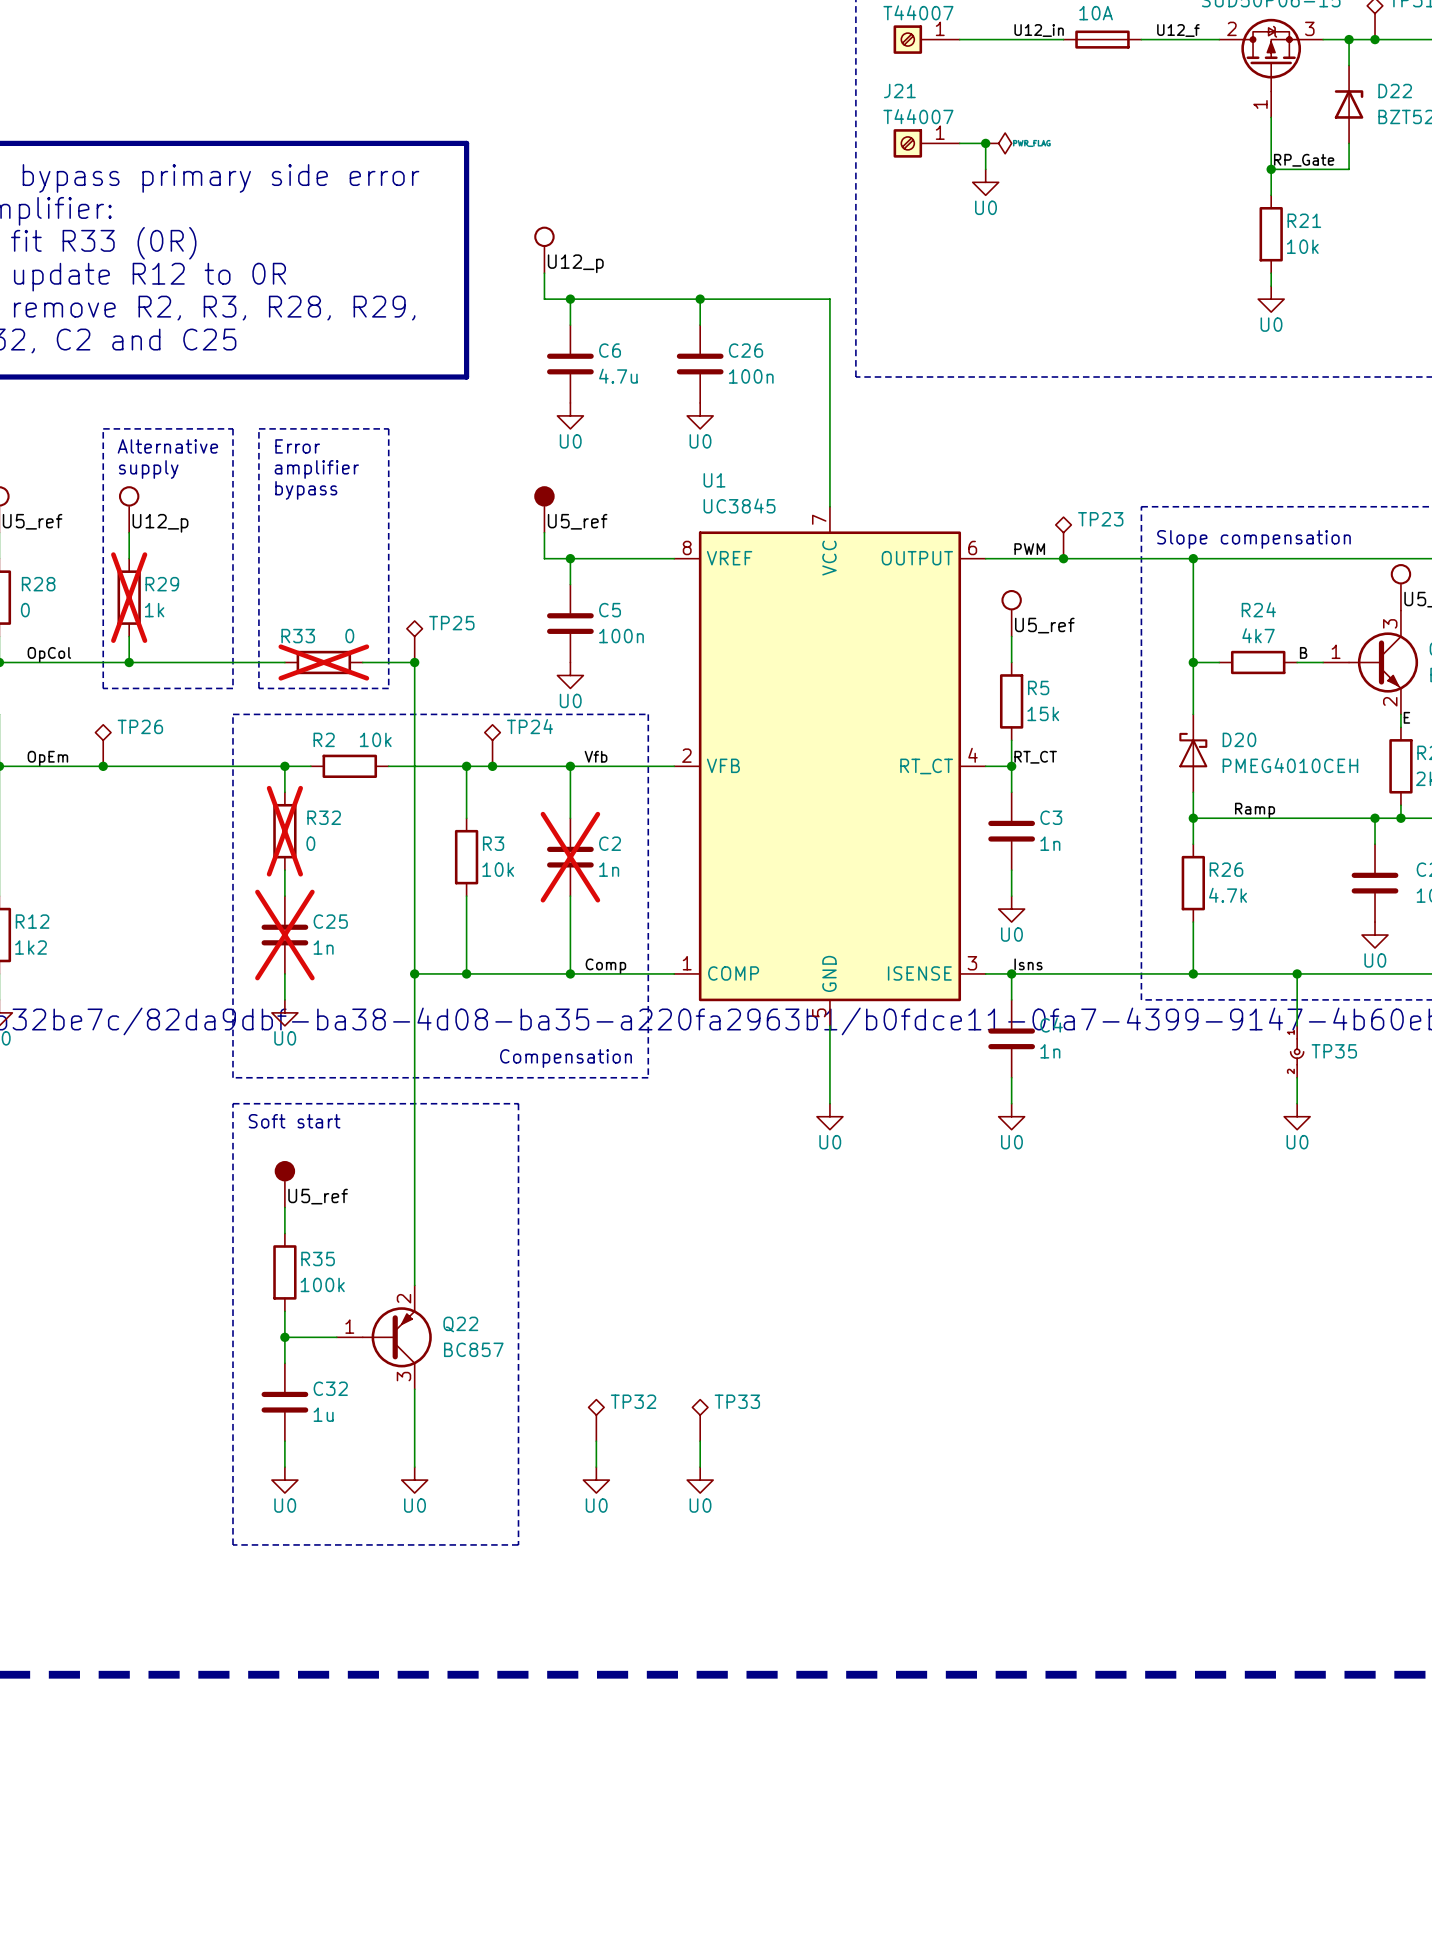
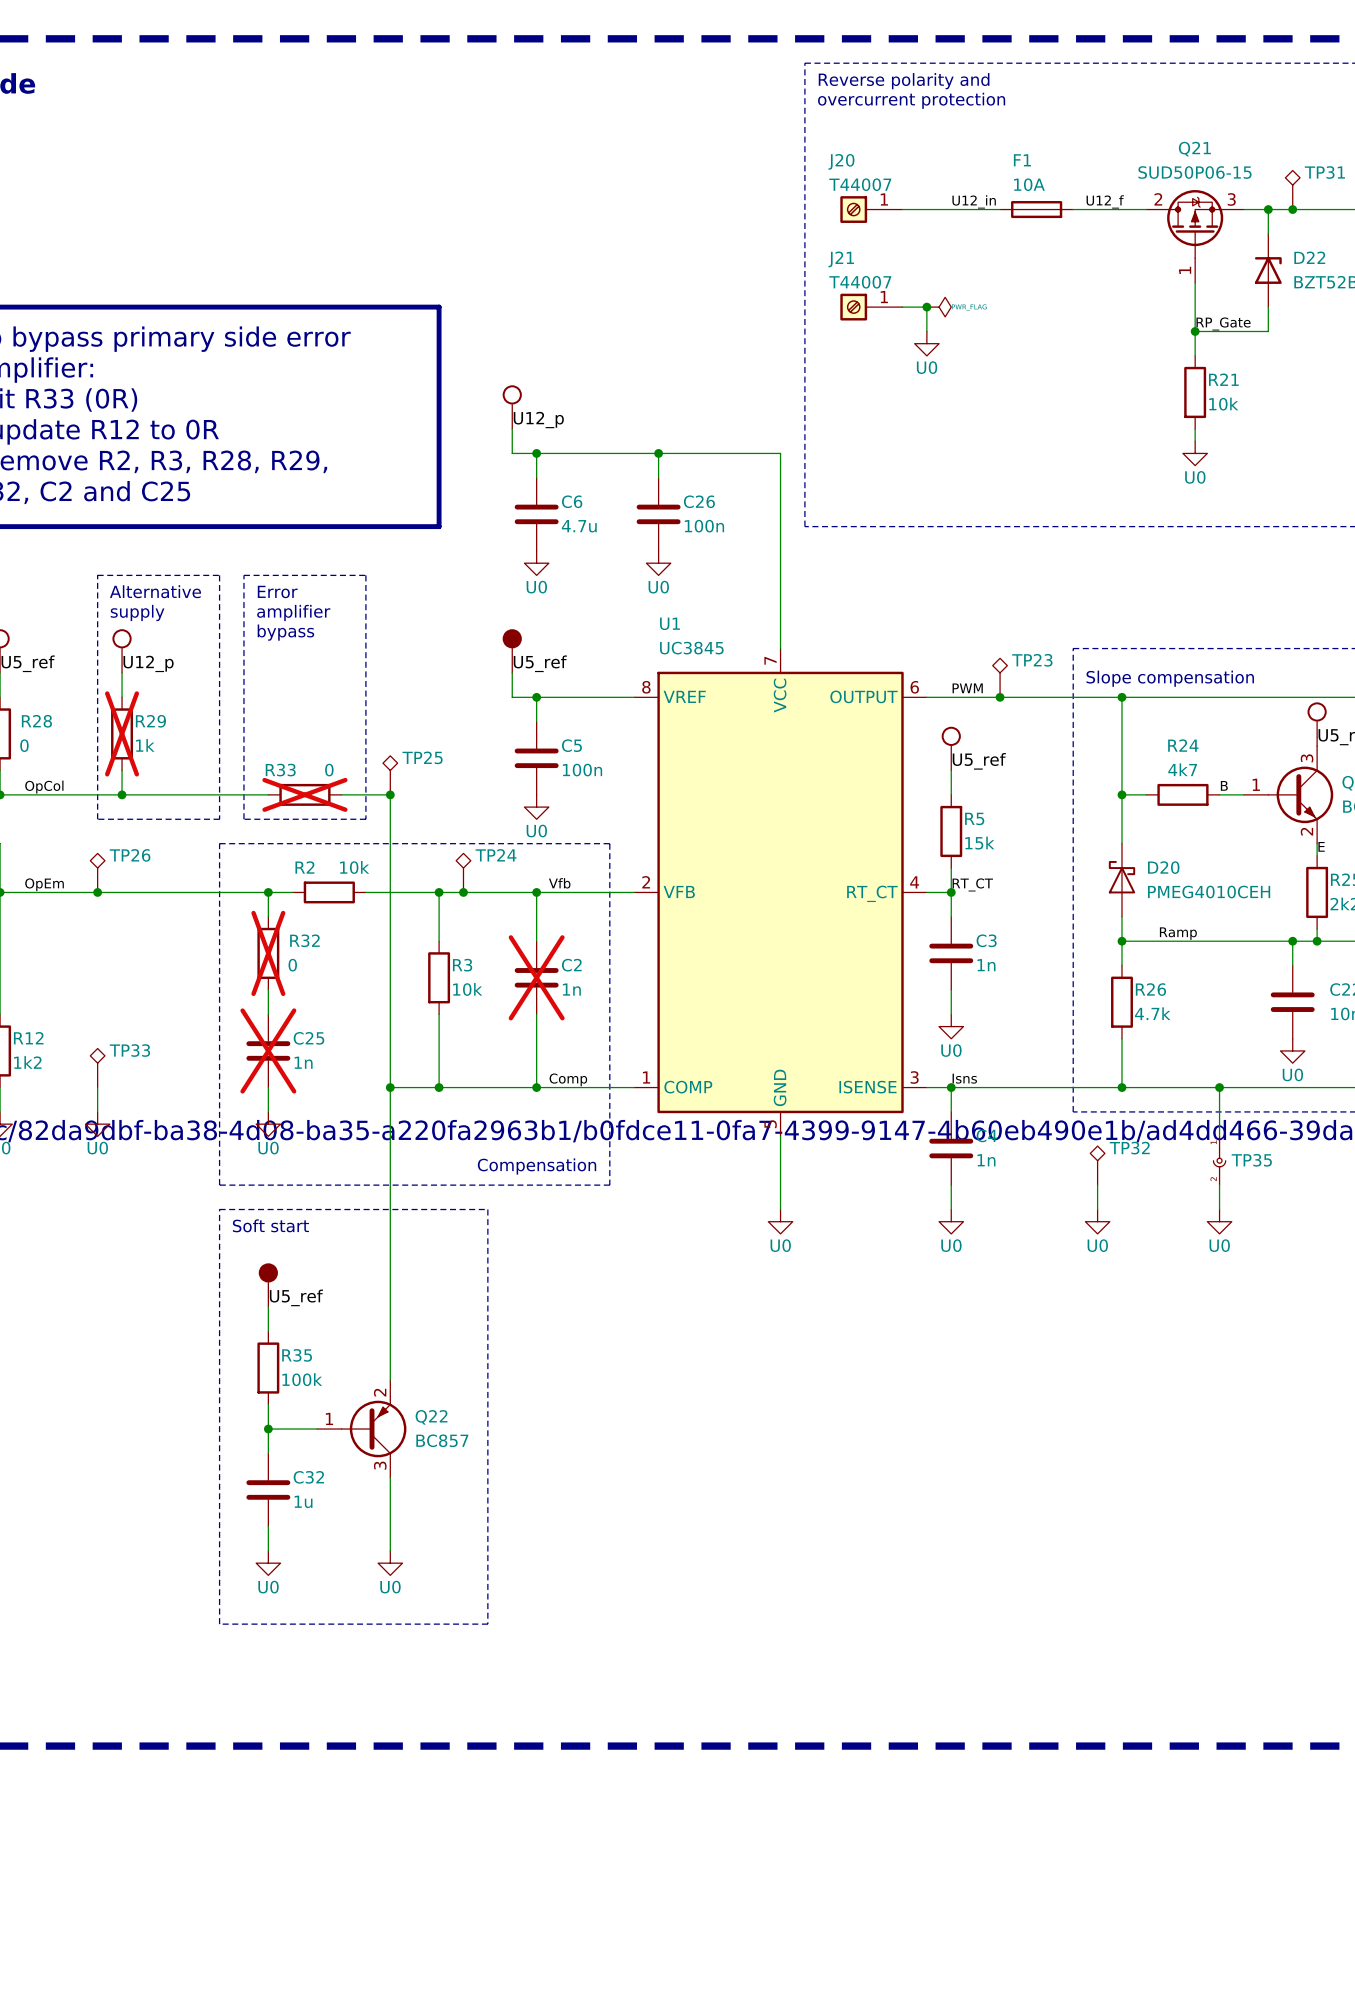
wire: none -> (97, 1087) (97, 1111)
power symbol: none -> U0 (97, 1124)
wire: none -> (1097, 1185) (1097, 1209)
power symbol: none -> U0 (1097, 1221)
TP32 position: (596, 1420) -> (1097, 1165)
TP33 position: (700, 1420) -> (97, 1068)
wire: (596, 1441) (596, 1467) -> none
wire: (700, 1441) (700, 1467) -> none
power symbol: U0 (596, 1480) -> none
power symbol: U0 (700, 1480) -> none

